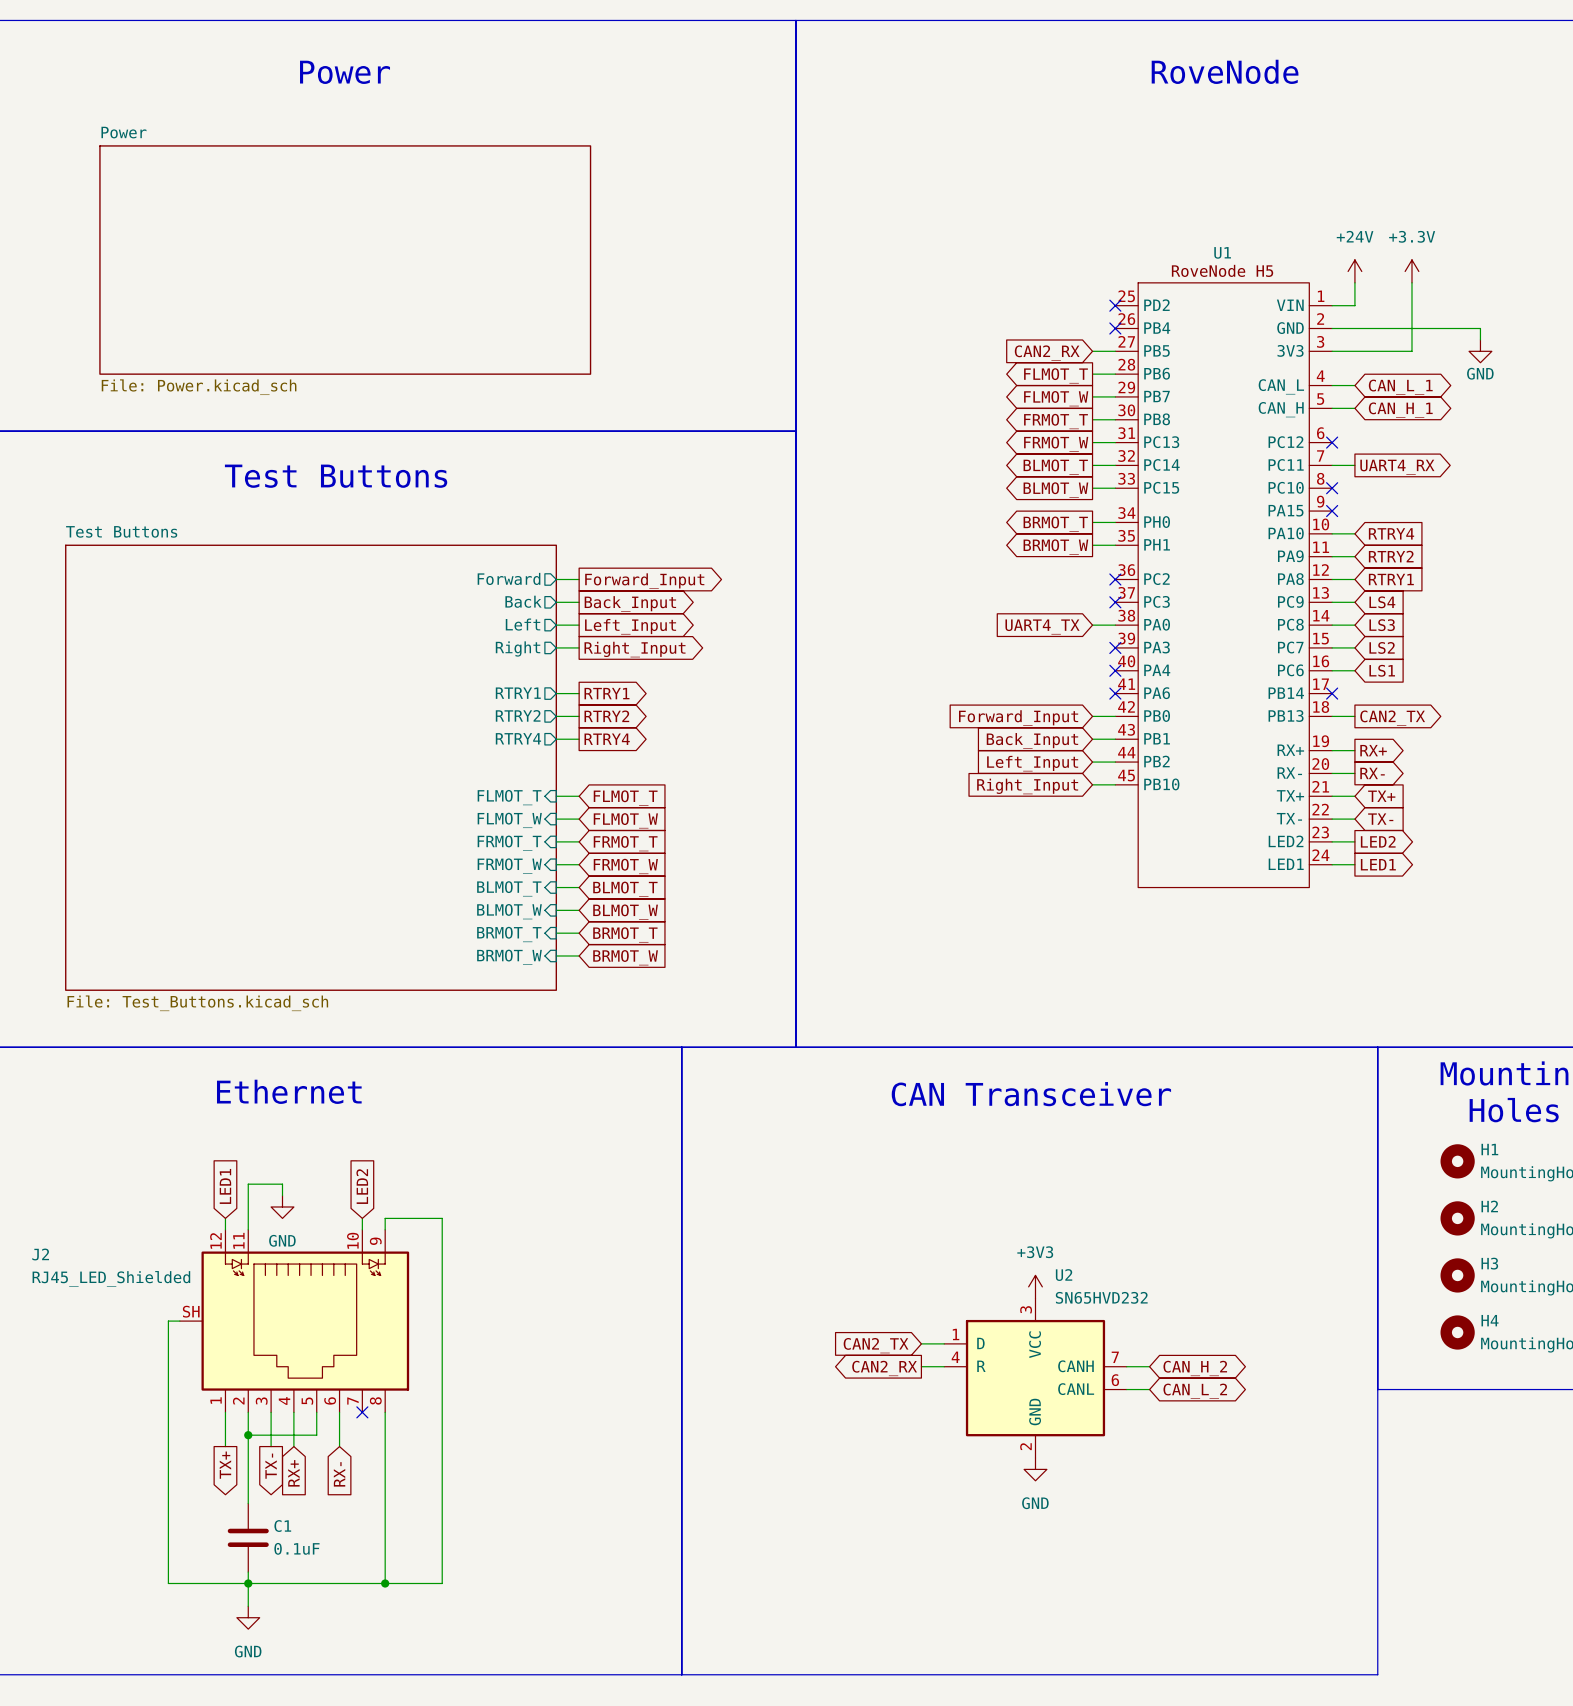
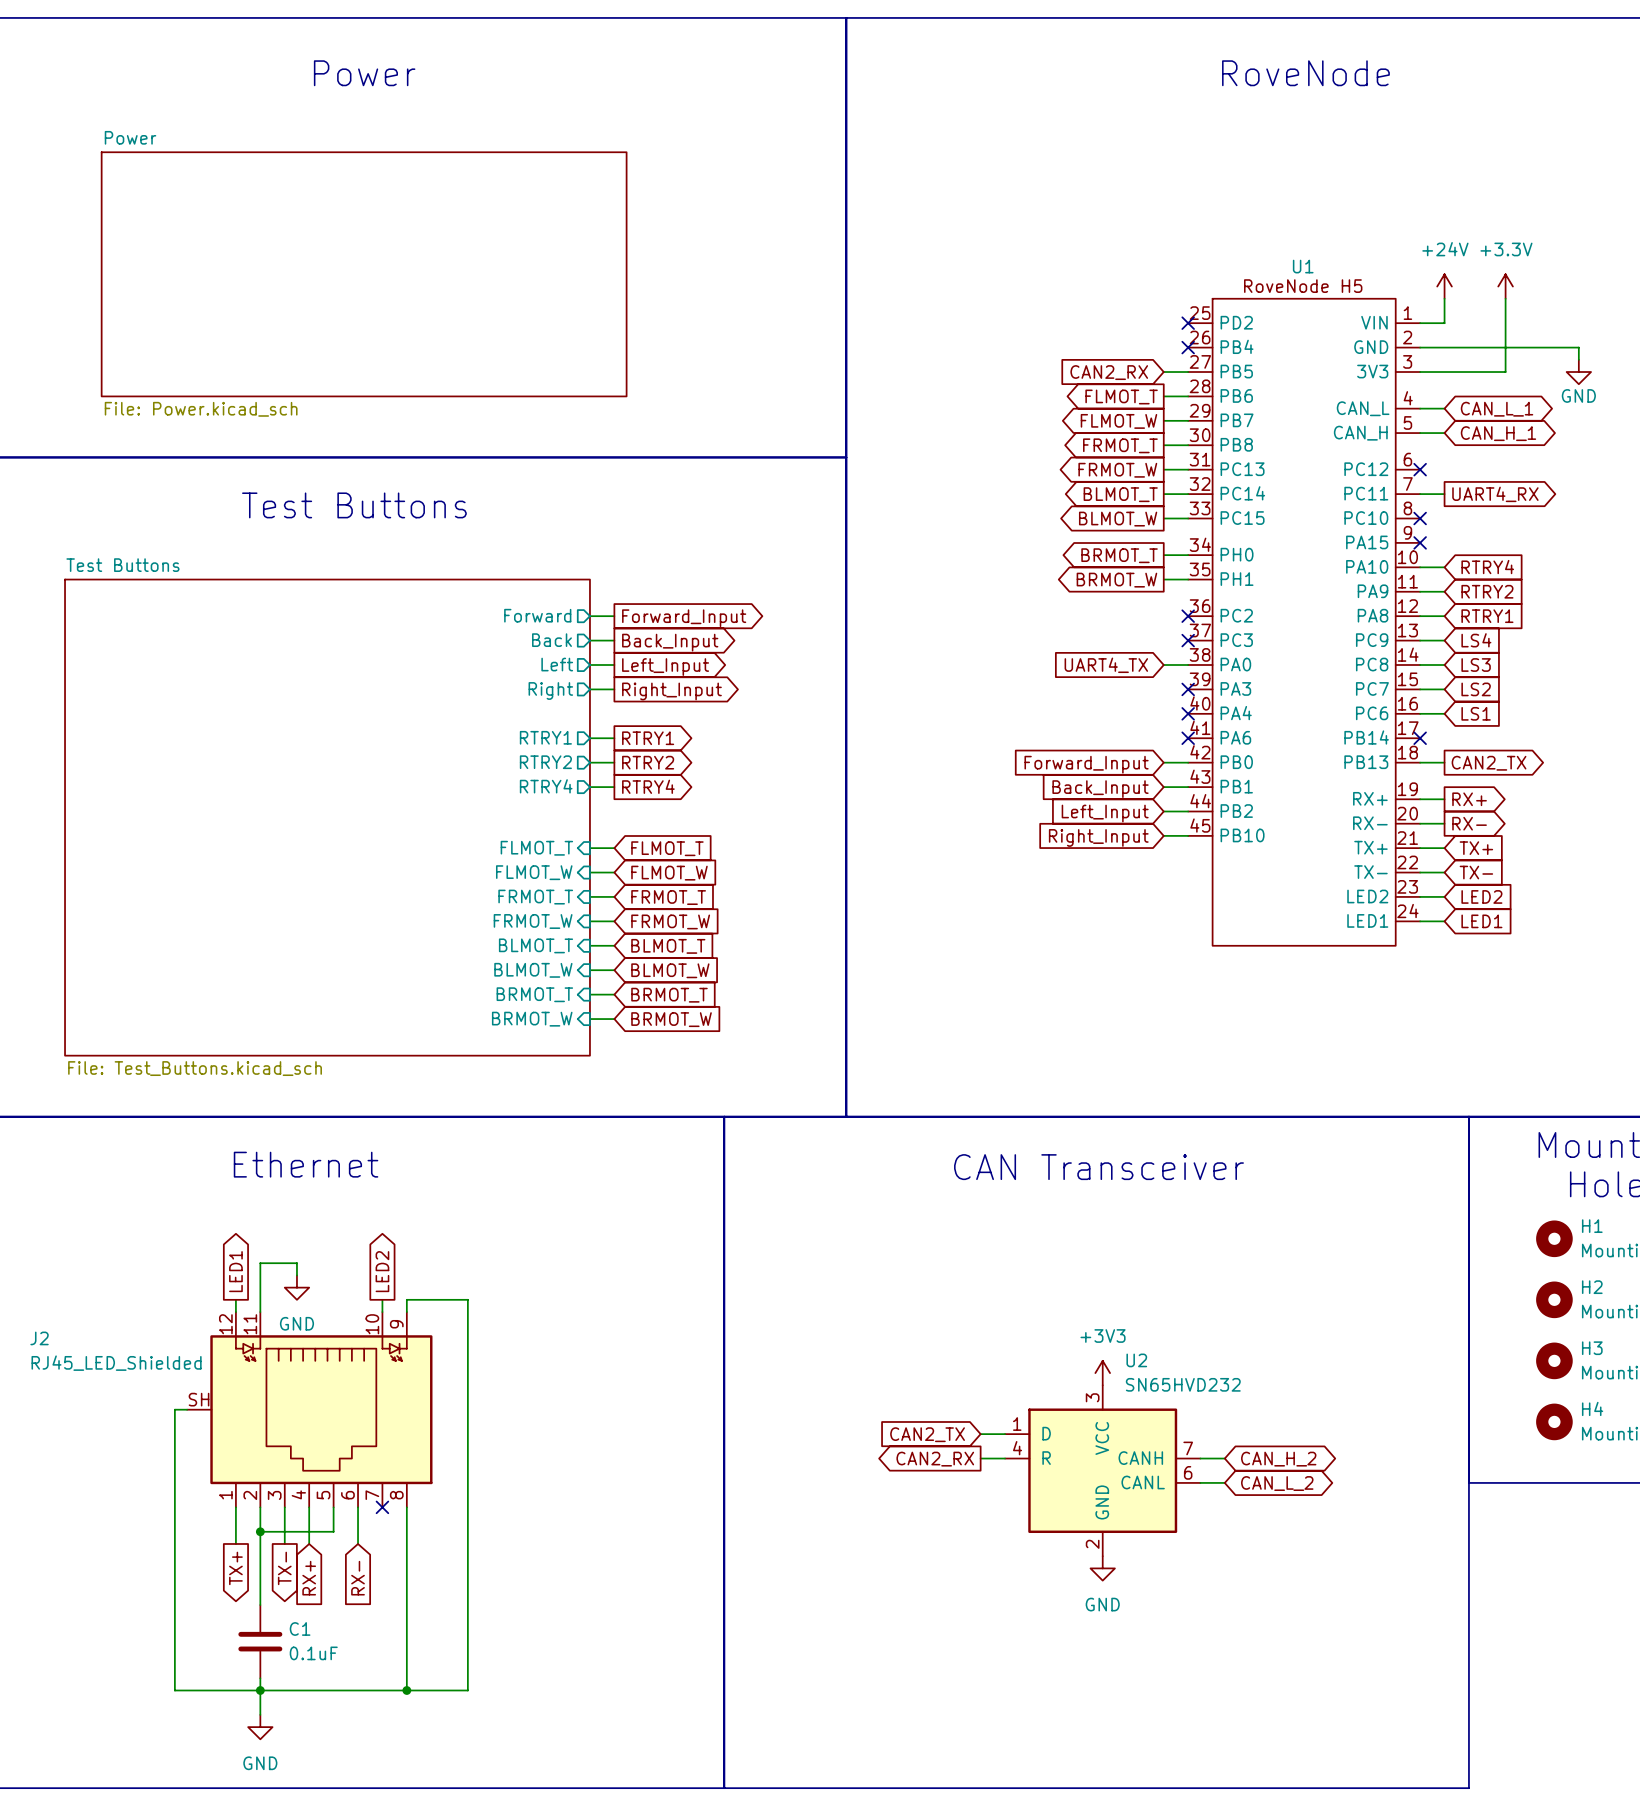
global label shape: output (1378, 841) -> input (1481, 896)
global label shape: output (1378, 864) -> input (1481, 921)
global label shape: input (225, 1186) -> output (235, 1271)
global label shape: input (362, 1186) -> output (382, 1271)

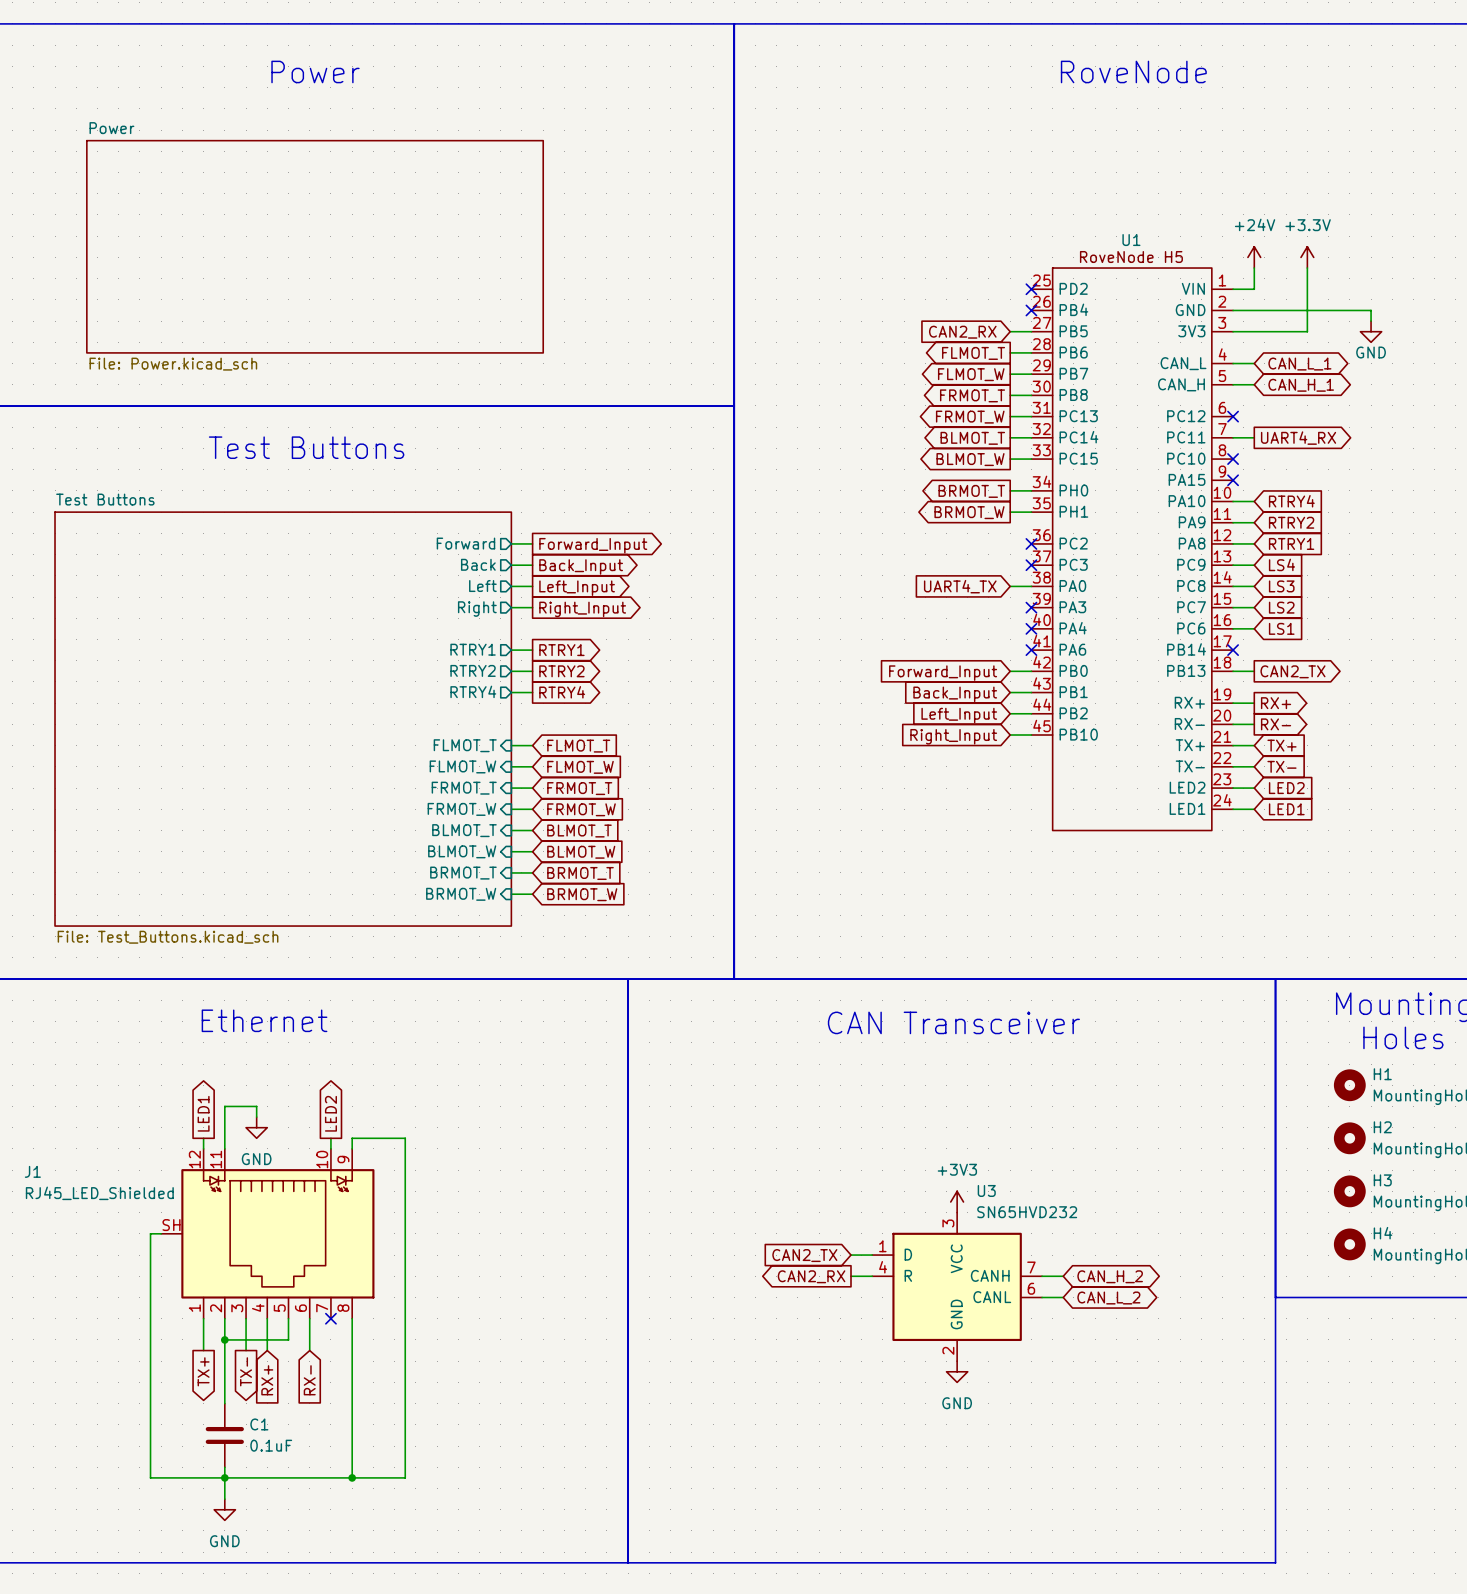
J2 name: J2 (39, 1338) -> J1 (32, 1171)
U2 name: U2 (1136, 1360) -> U3 (986, 1190)

